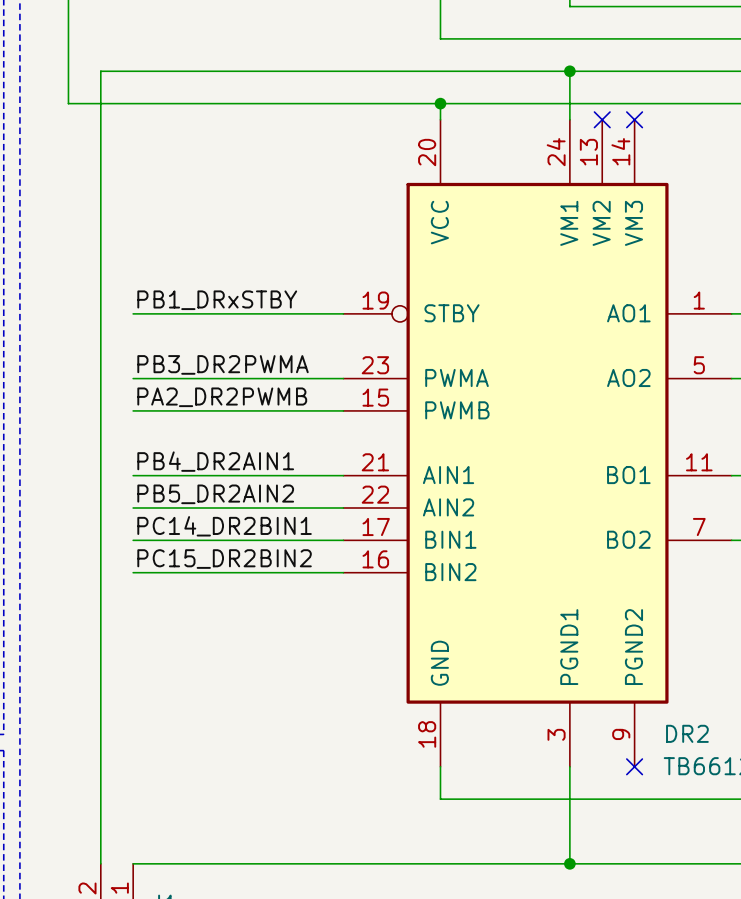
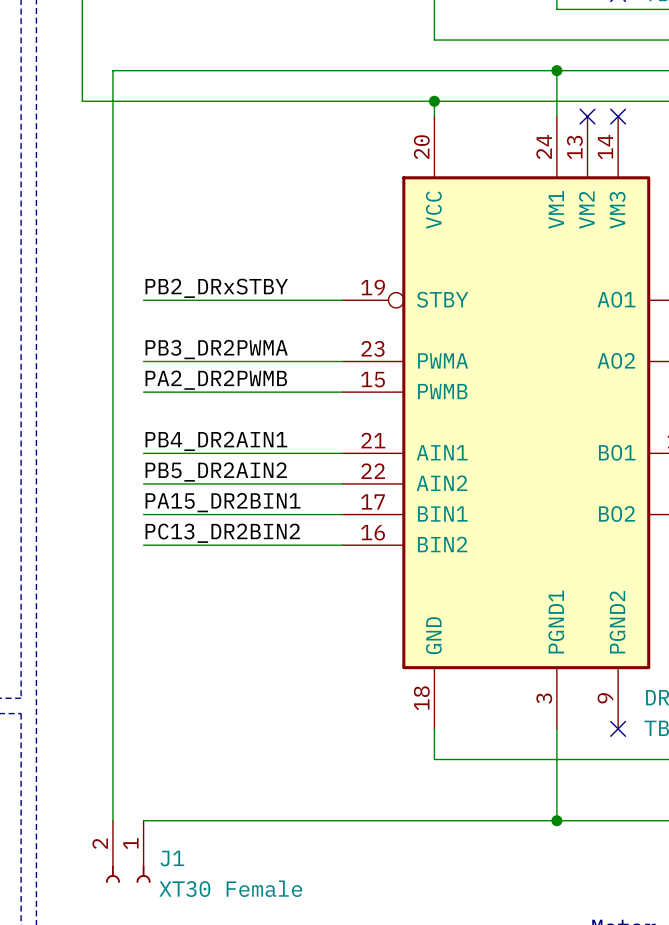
label: PB1_DRxSTBY (217, 300) -> PB2_DRxSTBY (216, 288)
label: PC14_DR2BIN1 (224, 526) -> PA15_DR2BIN1 (223, 502)
label: PC15_DR2BIN2 (224, 559) -> PC13_DR2BIN2 (222, 533)

